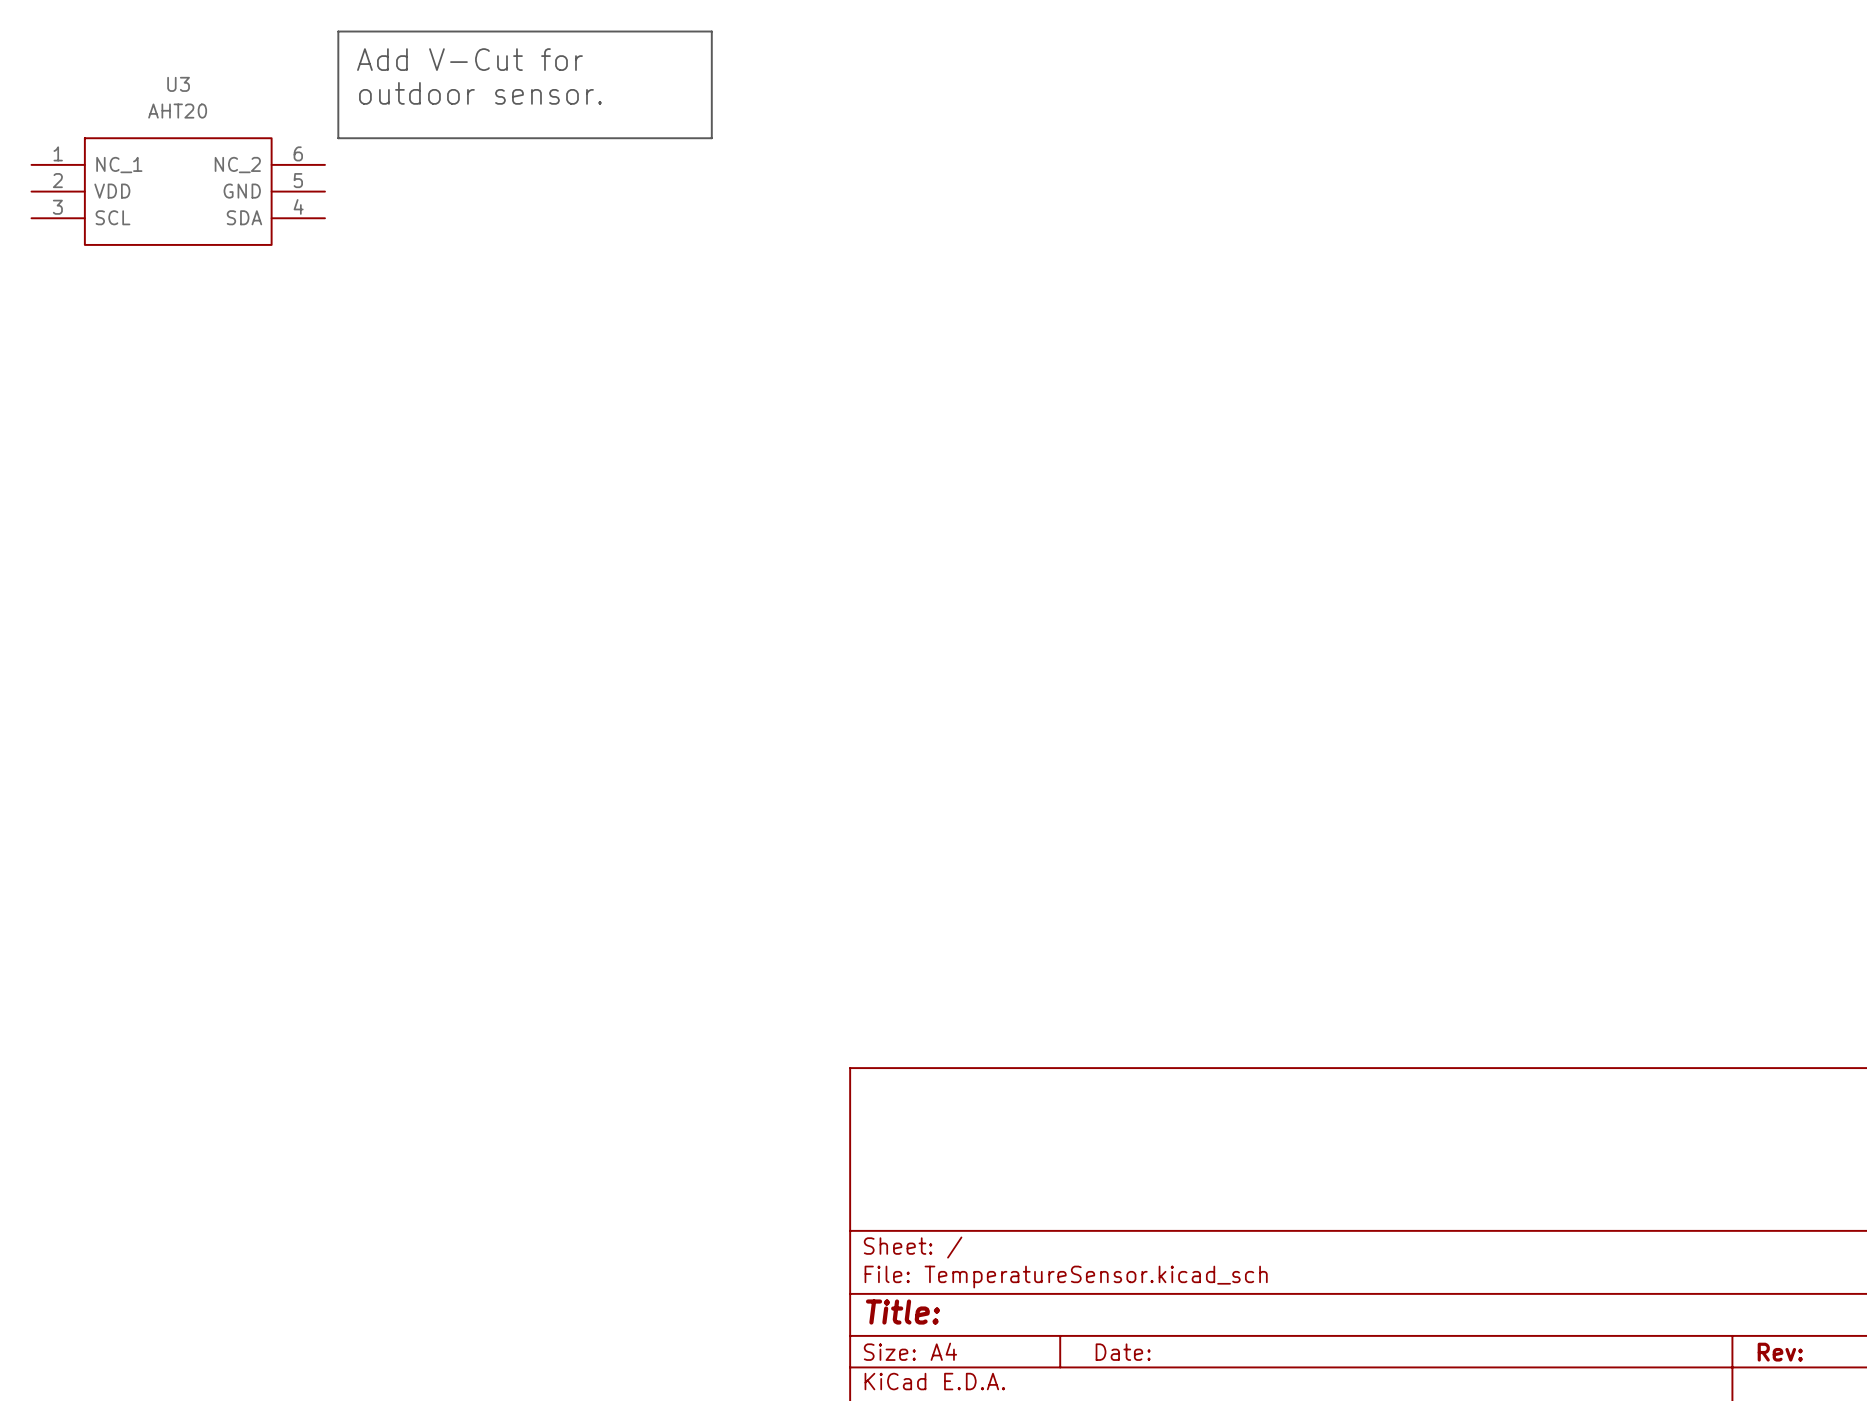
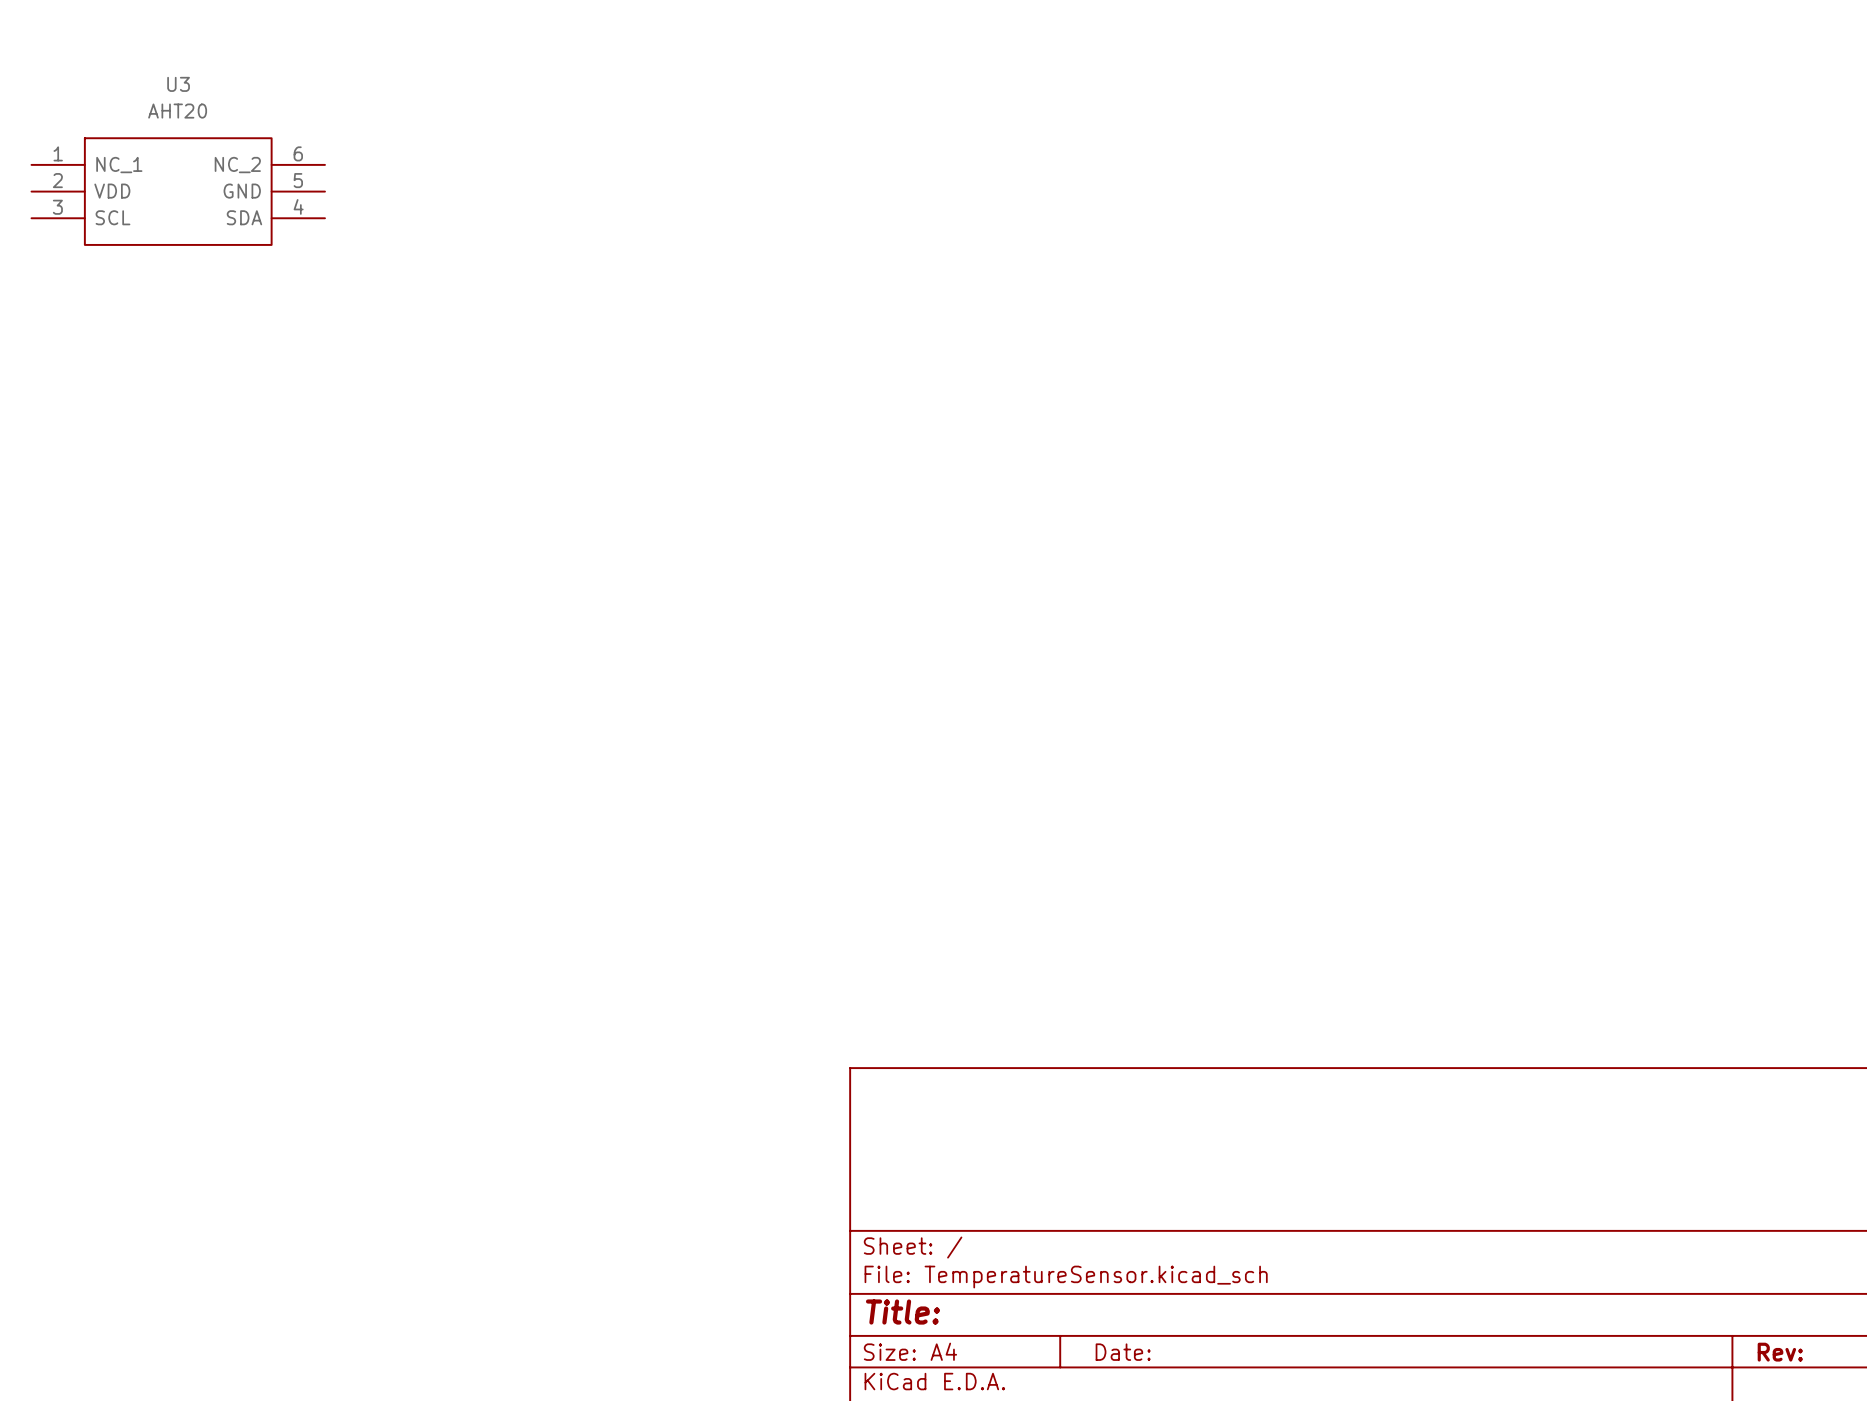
line: (338, 31) (711, 31) (711, 138) (338, 138) (338, 31) -> none
text: Add V-Cut for (469, 59) -> none
text: outdoor sensor. (480, 93) -> none

